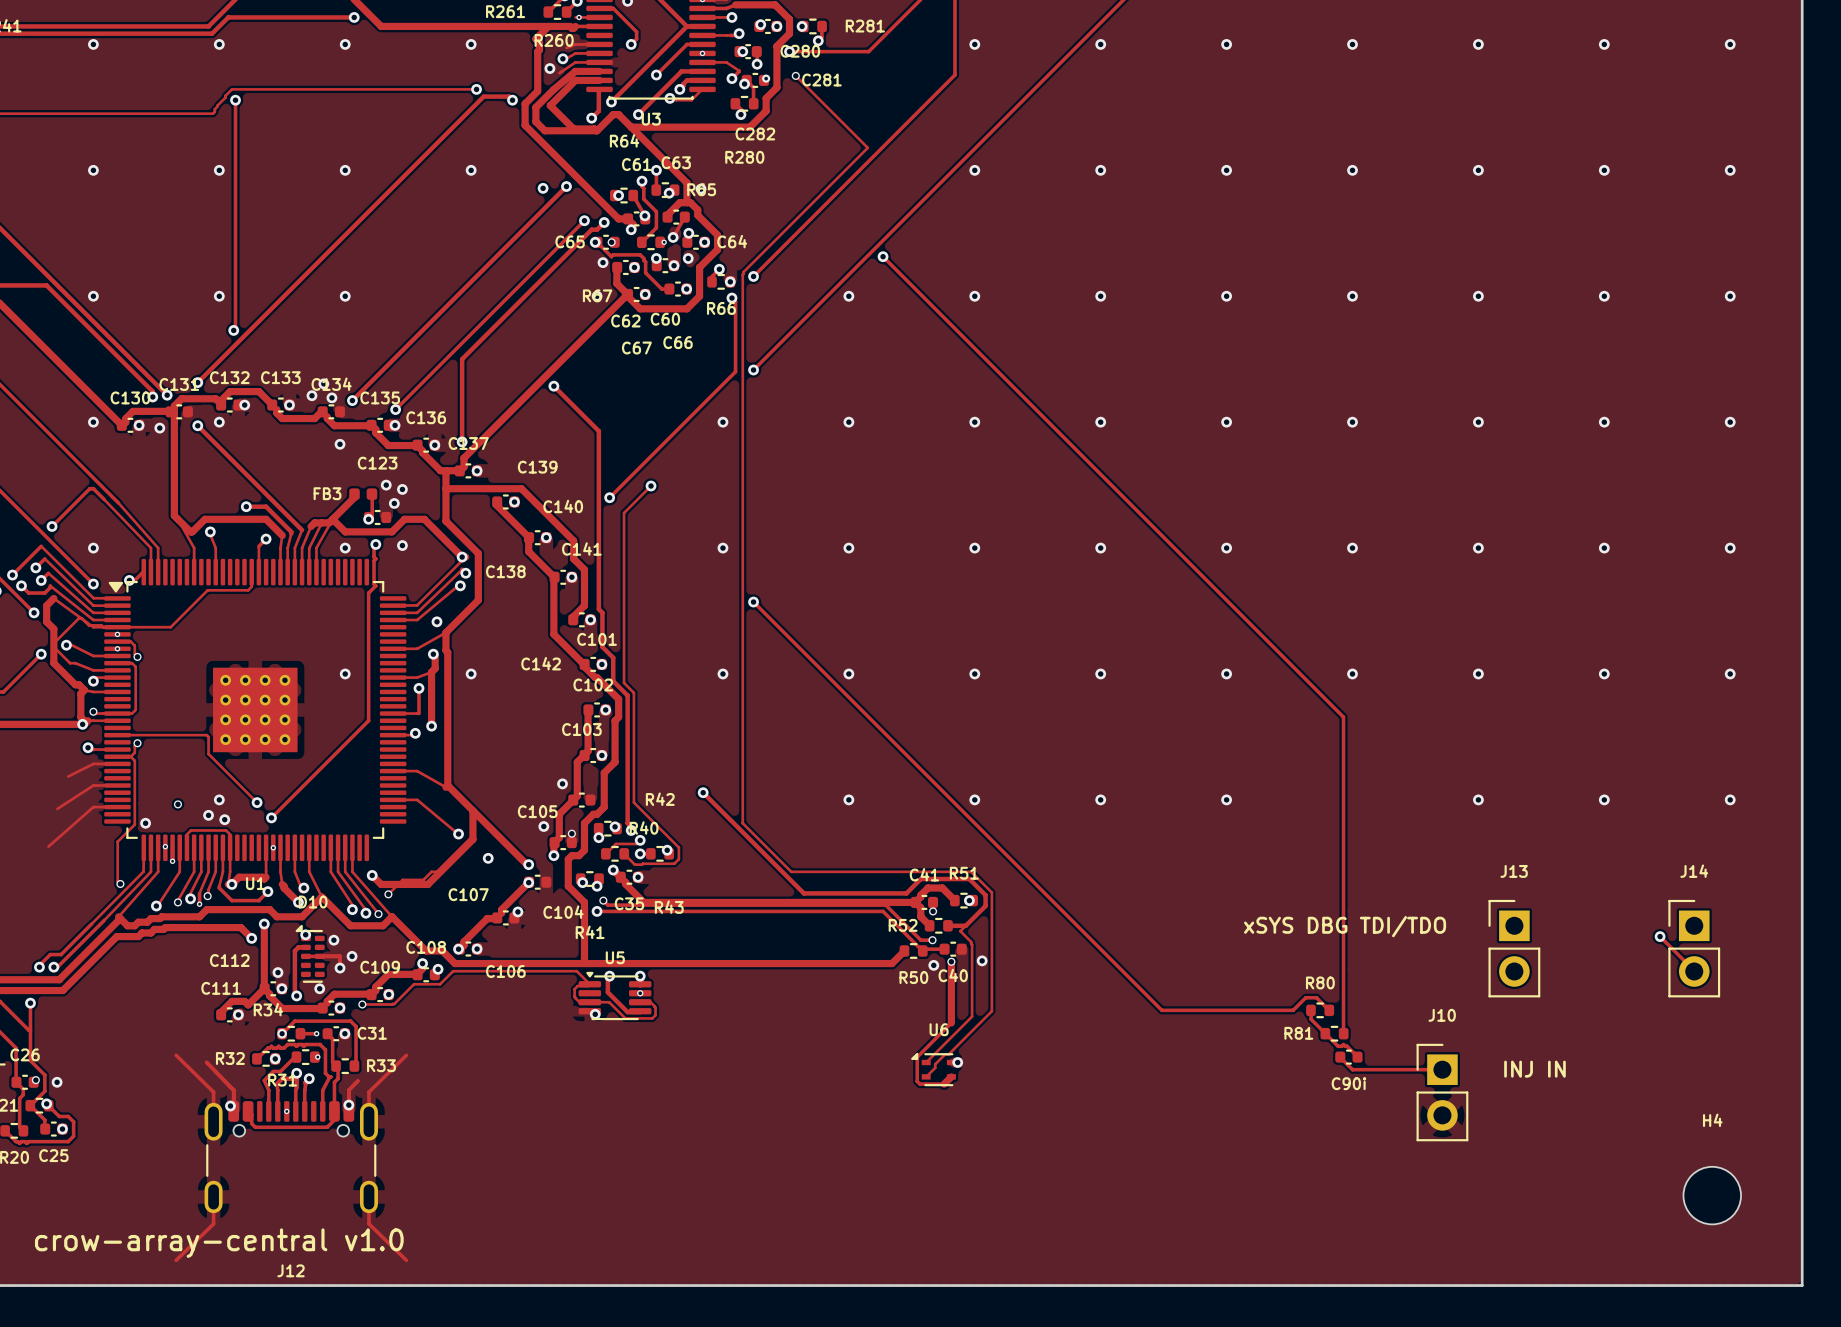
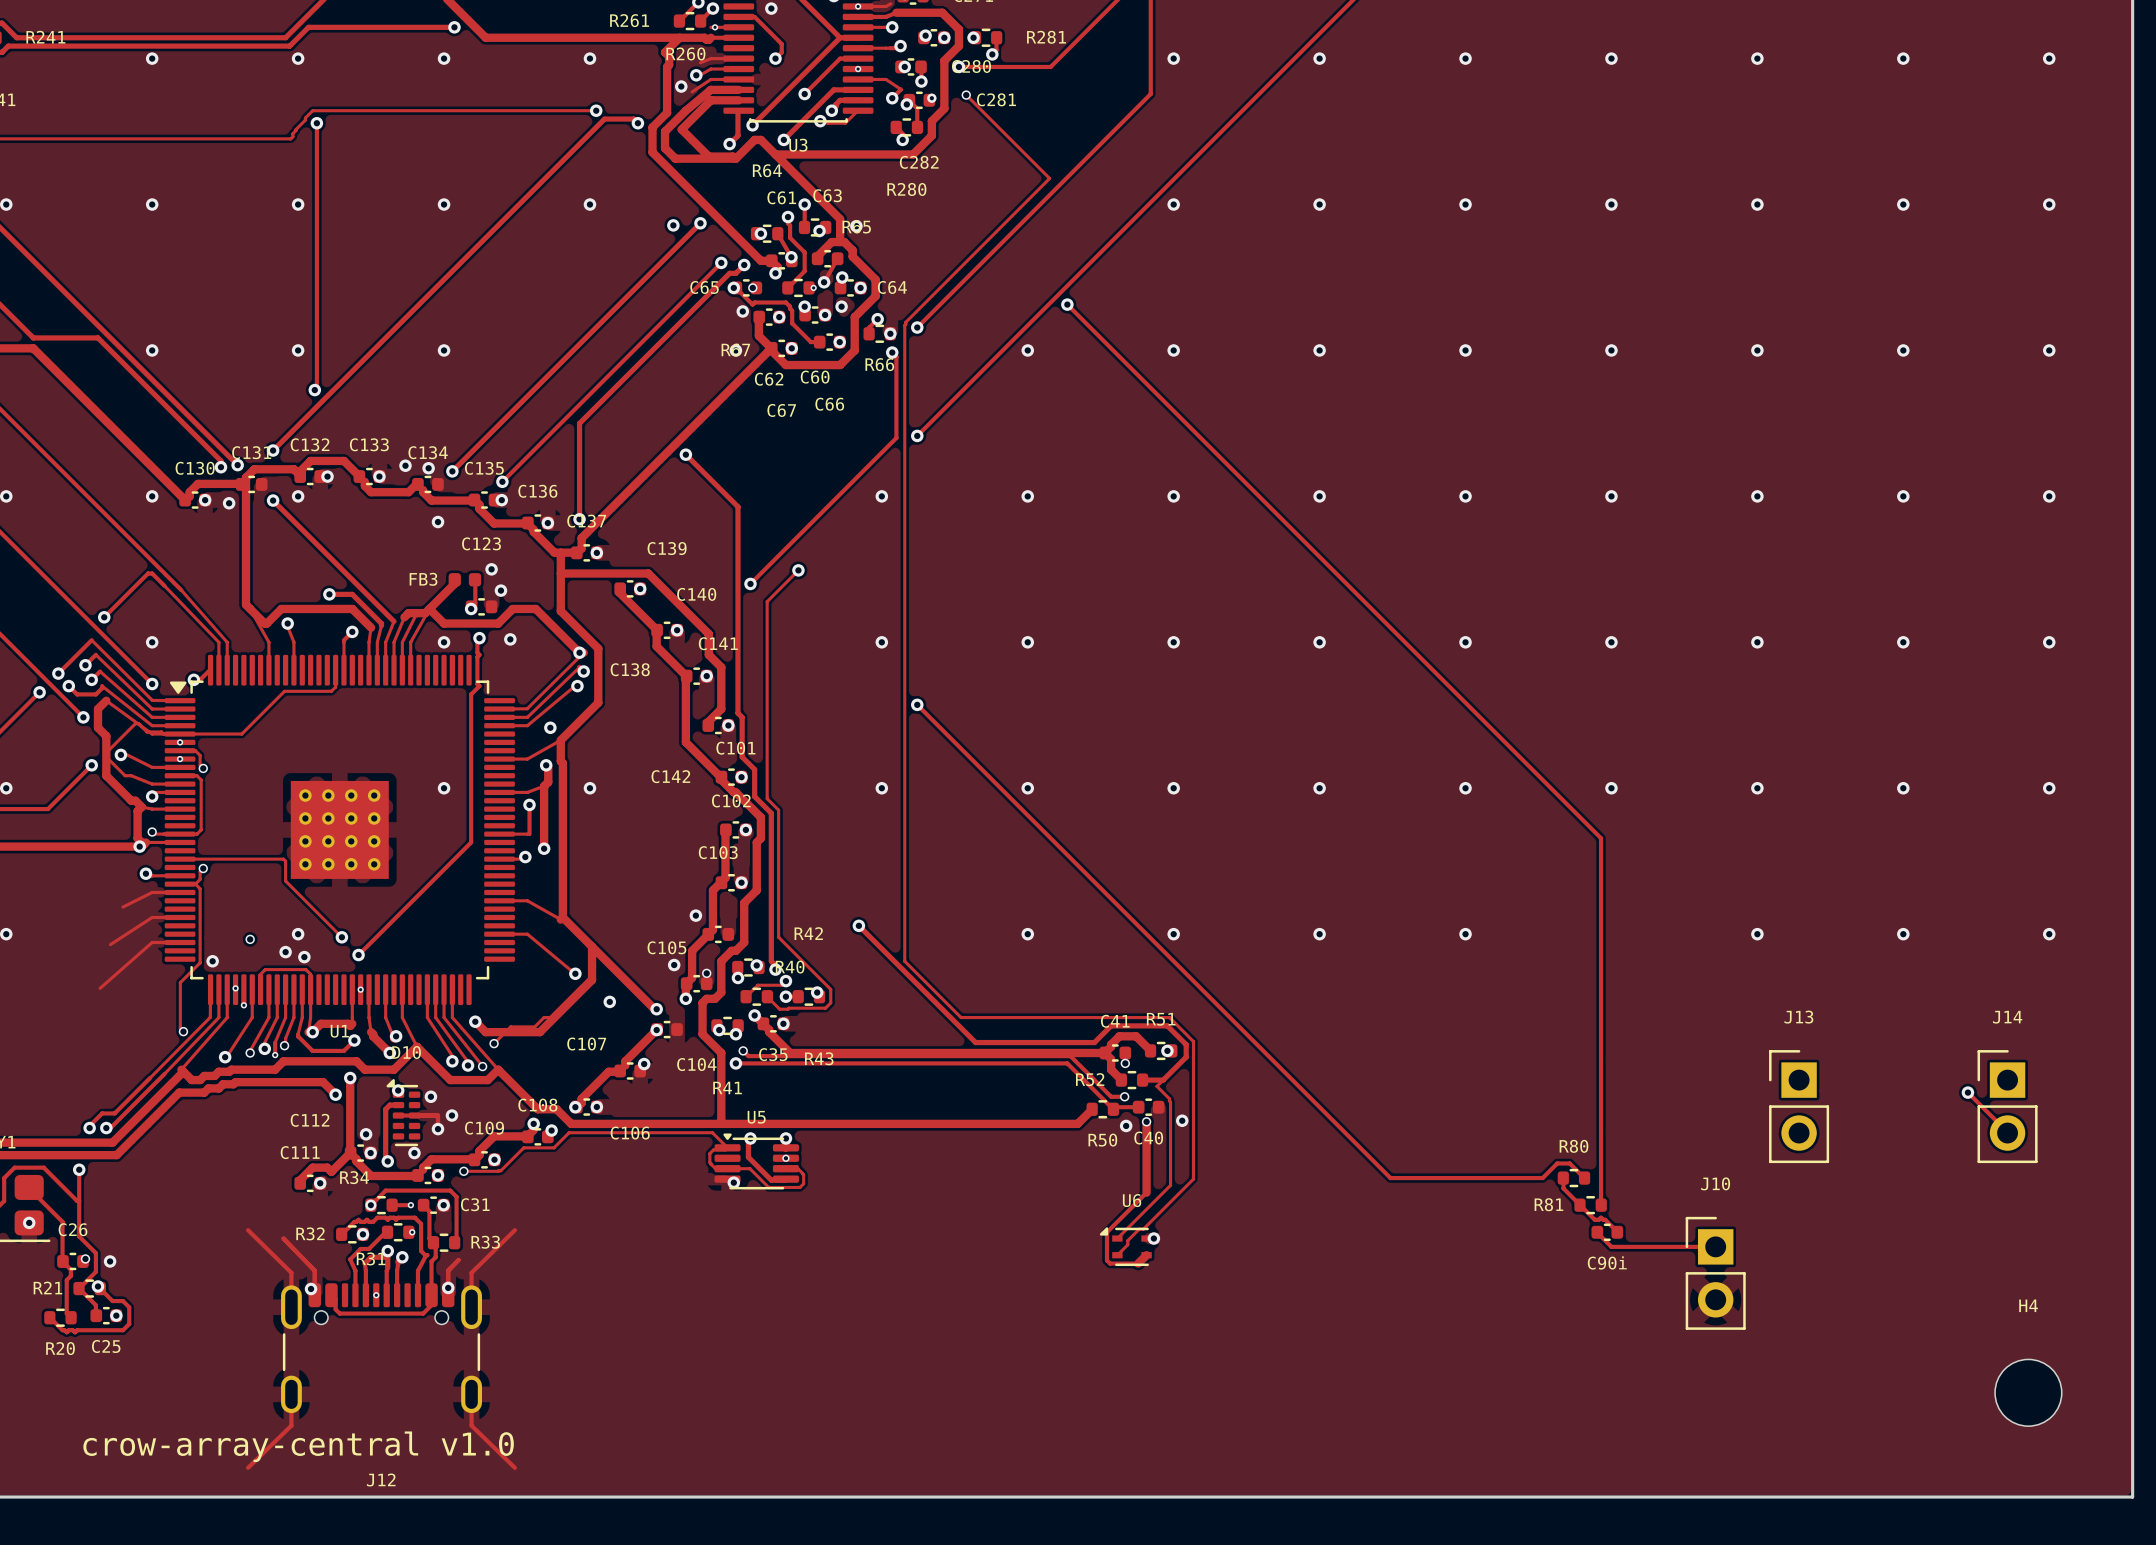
via: (323, 383) -> none
via: (402, 489) -> none
text: xSYS DBG TDI/TDO (1345, 926) -> none
text: INJ IN (1534, 1069) -> none

